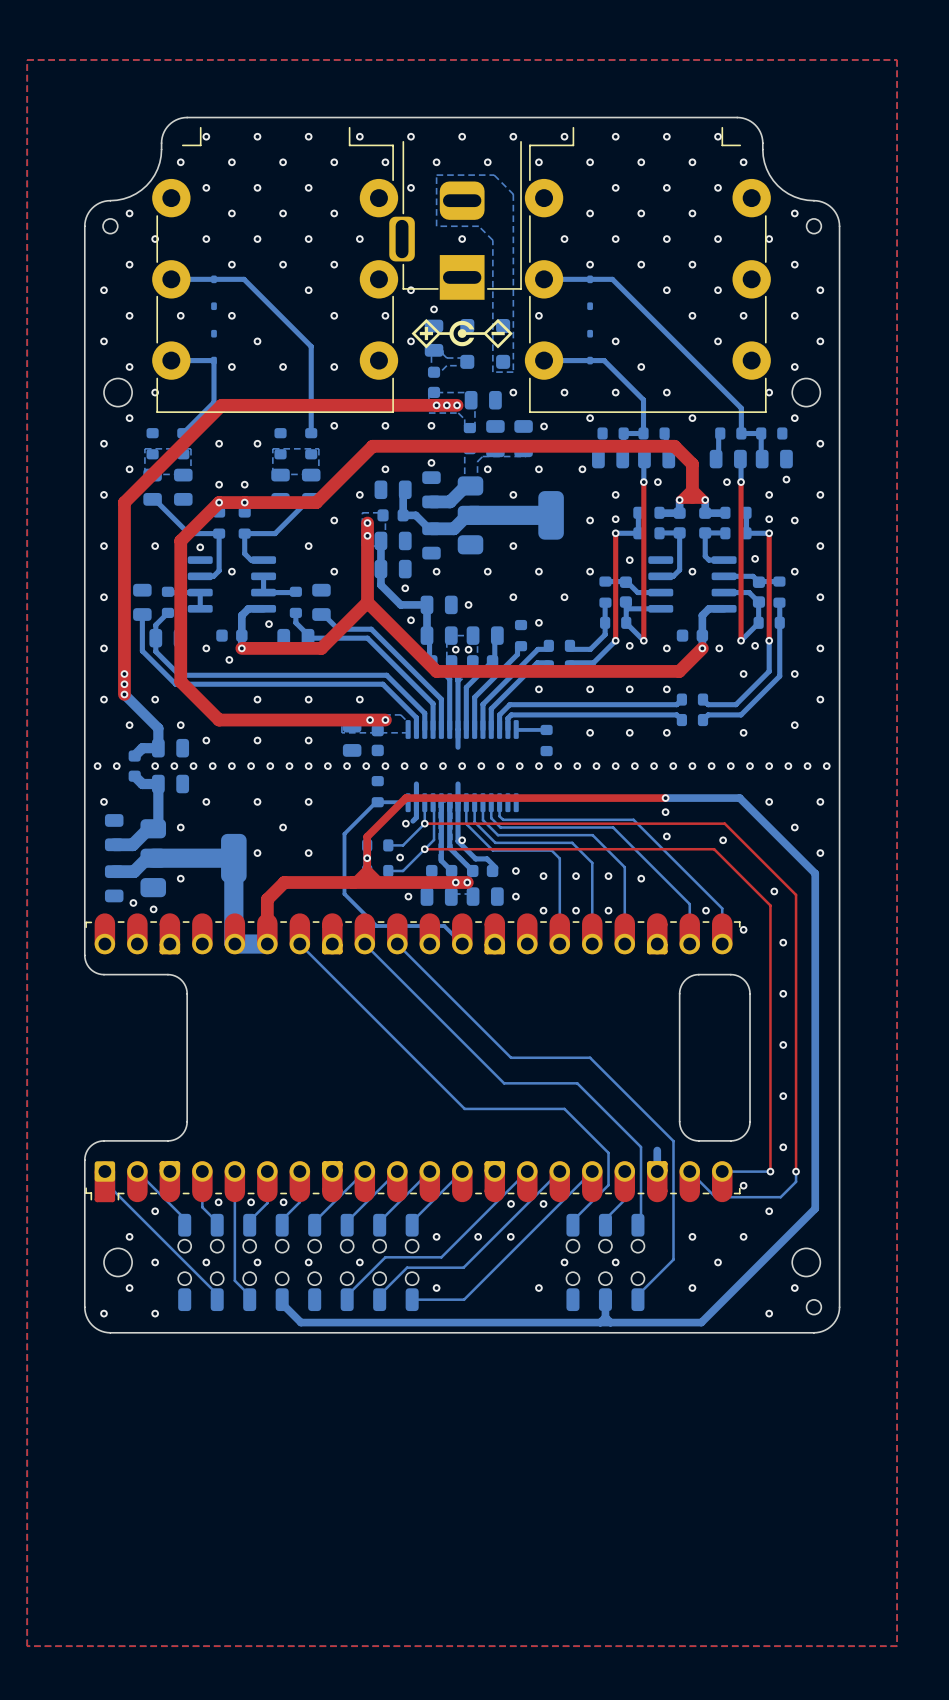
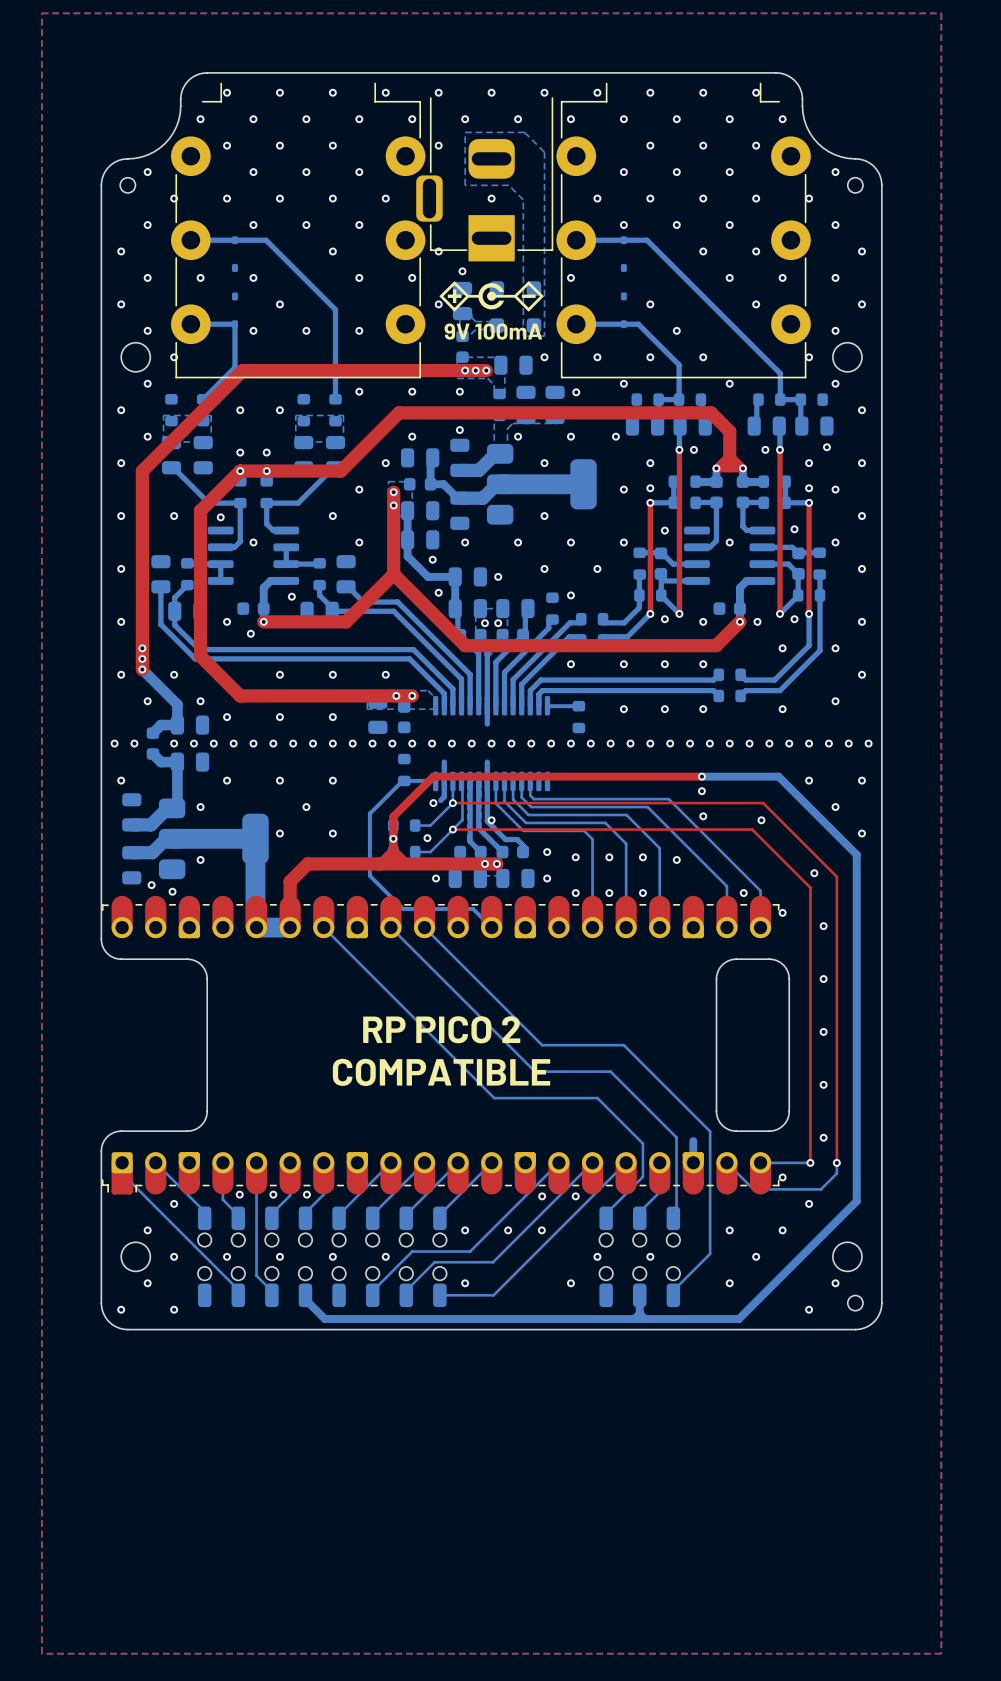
text: none -> 9V 100mA (493, 331)
text: none -> RP PICO 2 (441, 1029)
text: none -> COMPATIBLE (441, 1072)

